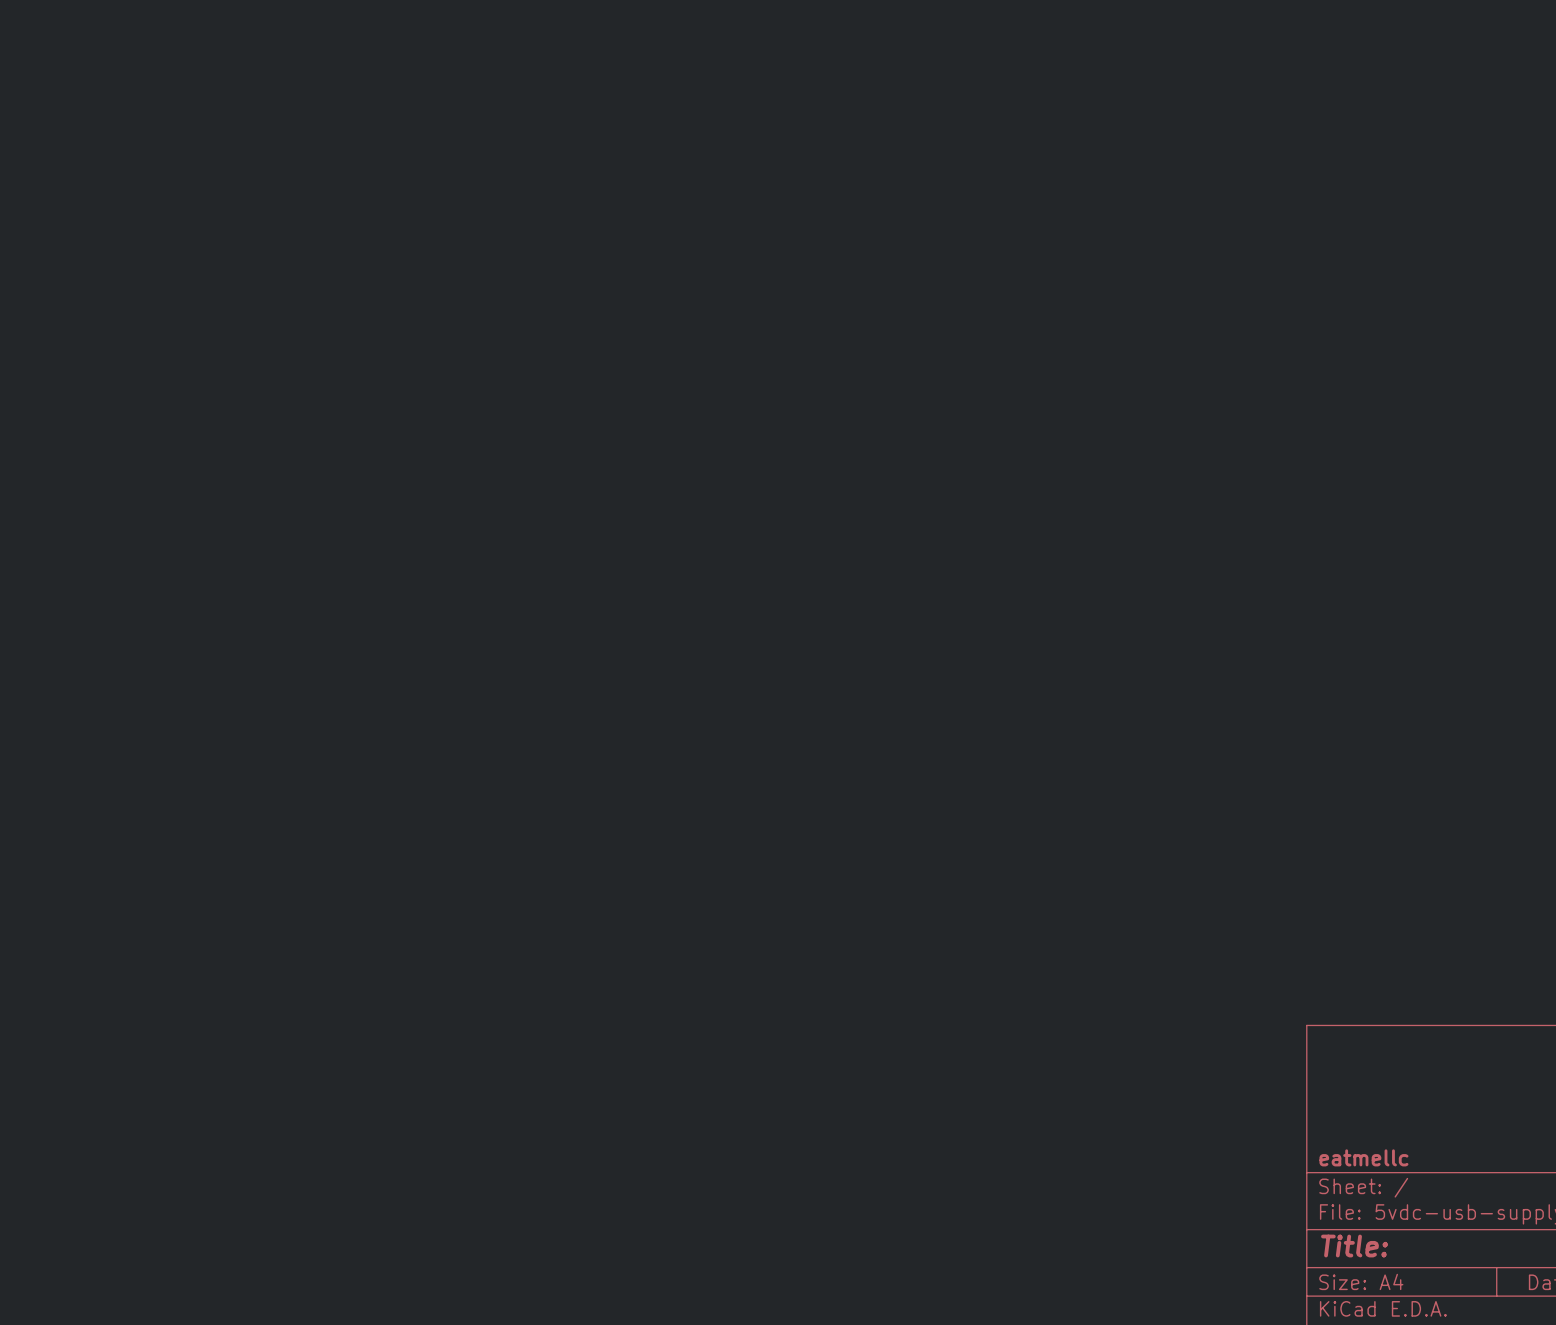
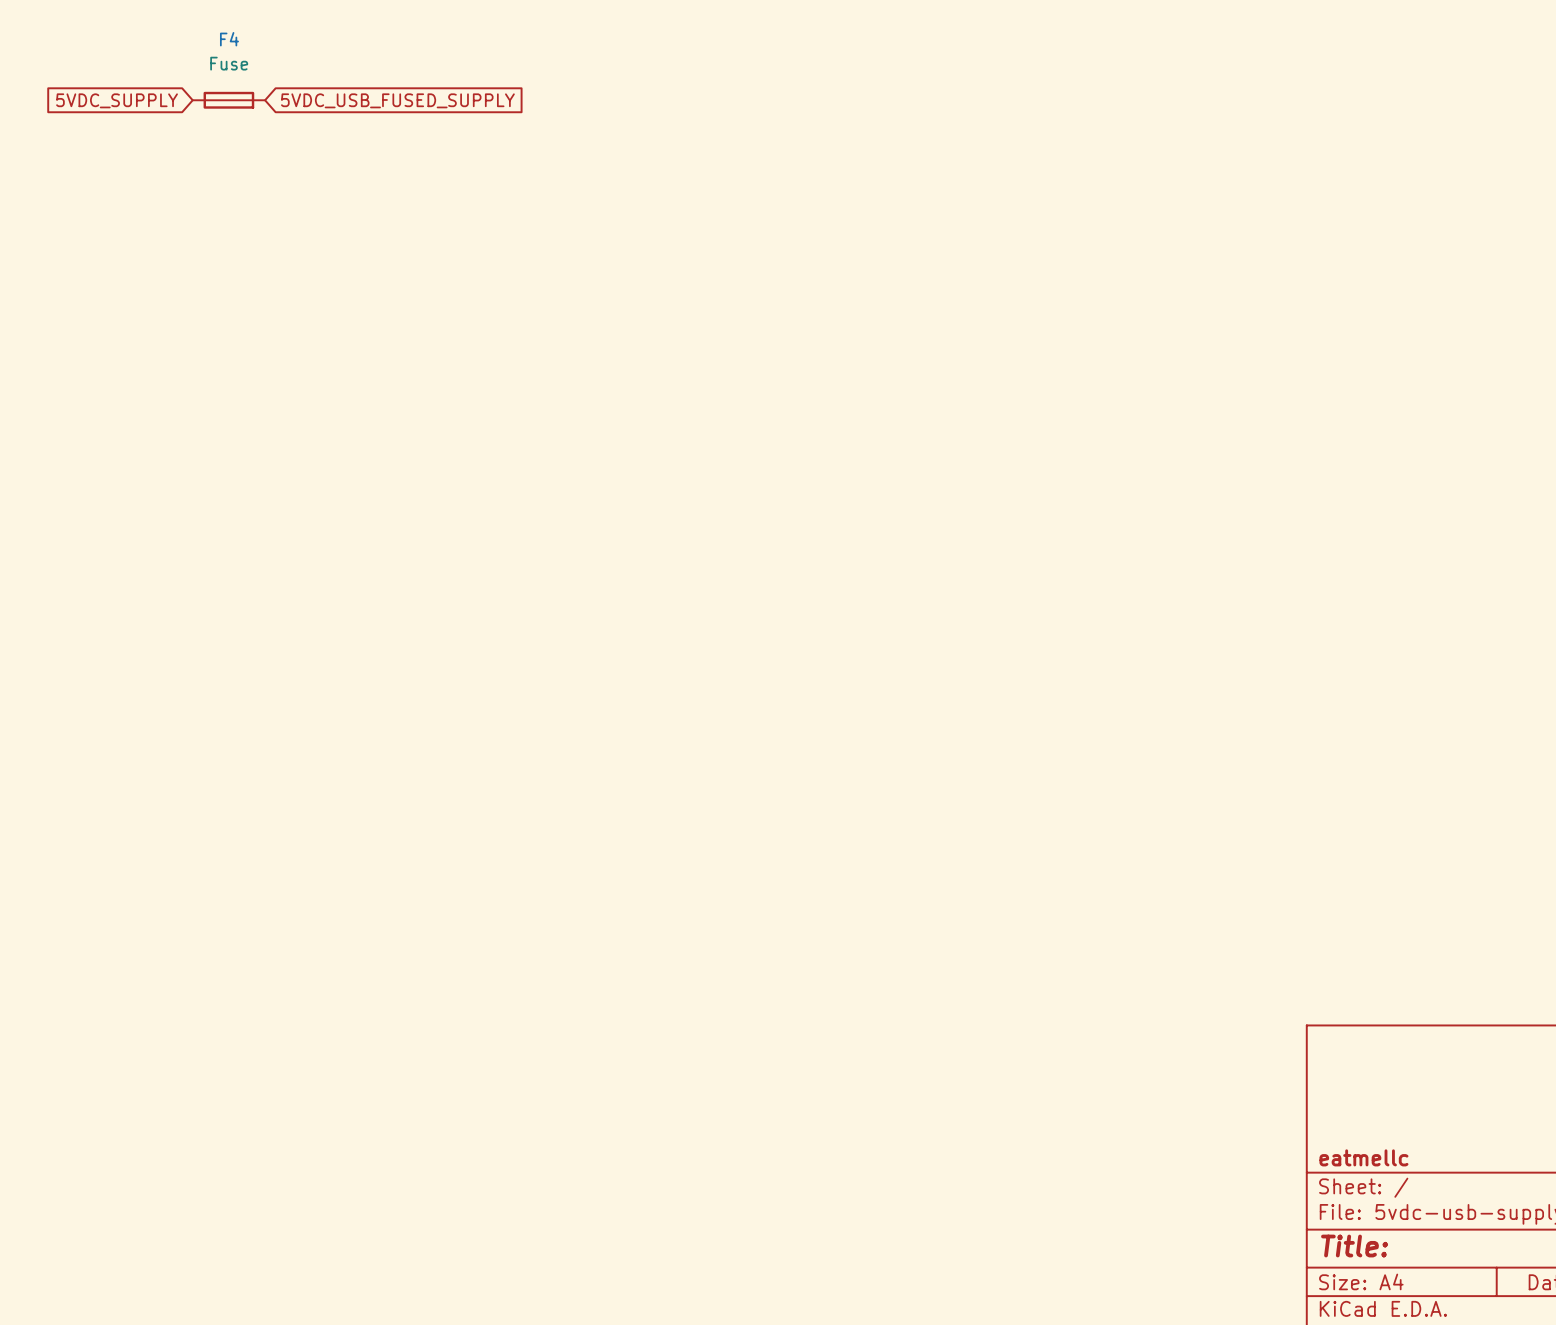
global label: none -> 5VDC_SUPPLY (117, 100)
F4: none -> Fuse (228, 100)
global label: none -> 5VDC_USB_FUSED_SUPPLY (397, 100)

